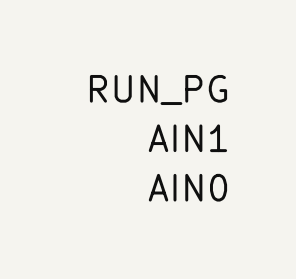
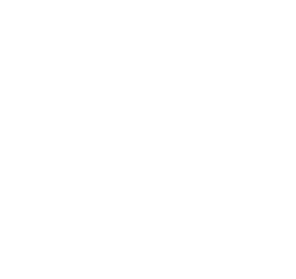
label: RUN_PG (158, 89) -> none
label: AIN1 (187, 138) -> none
label: AIN0 (187, 187) -> none

